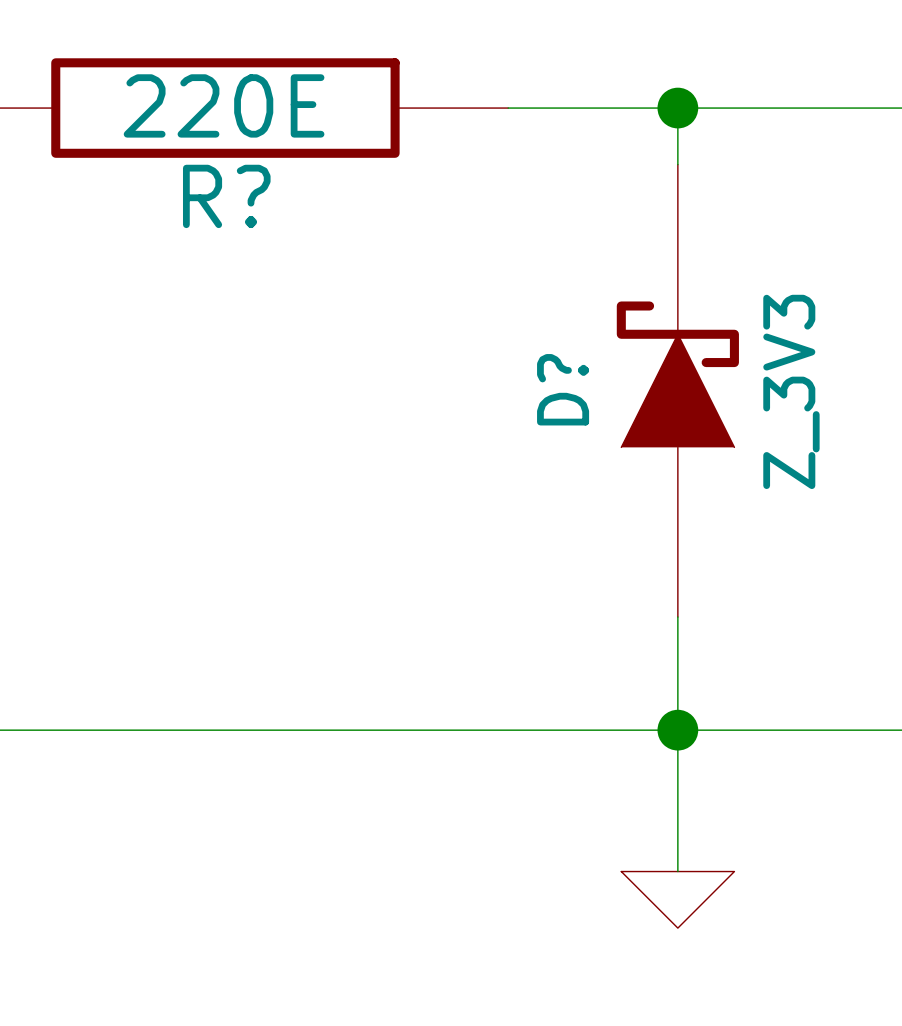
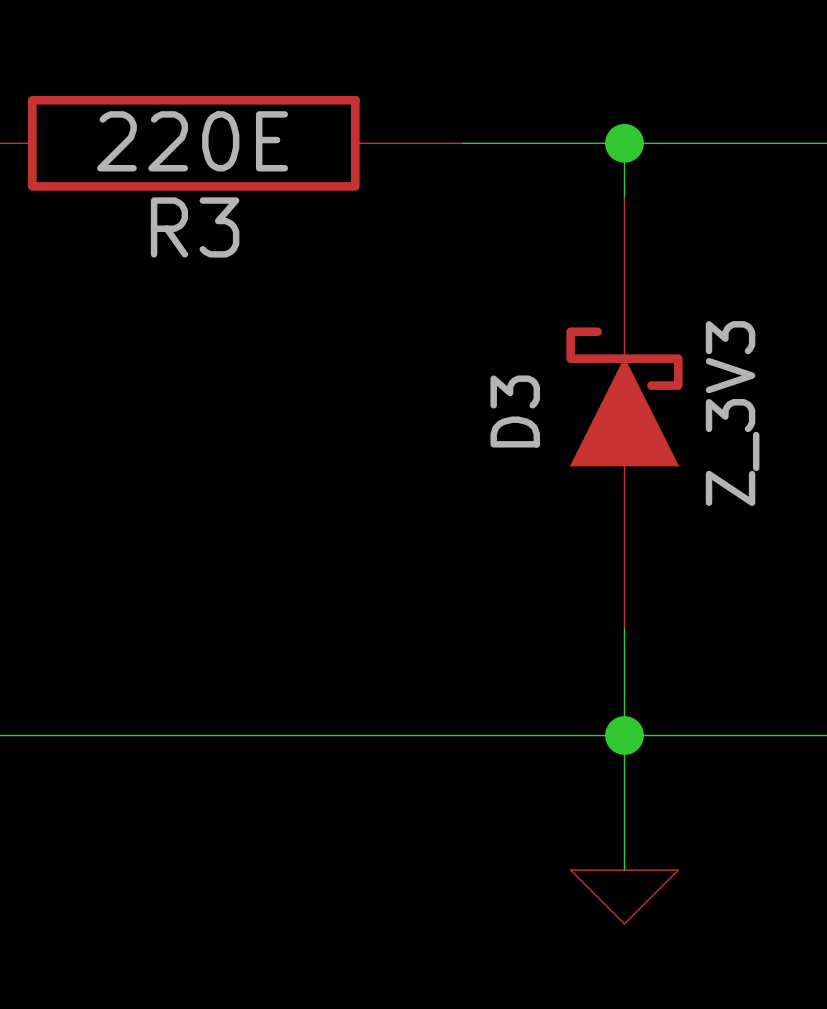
R? name: R? (226, 196) -> R3 (195, 227)
D? name: D? (563, 389) -> D3 (515, 411)

